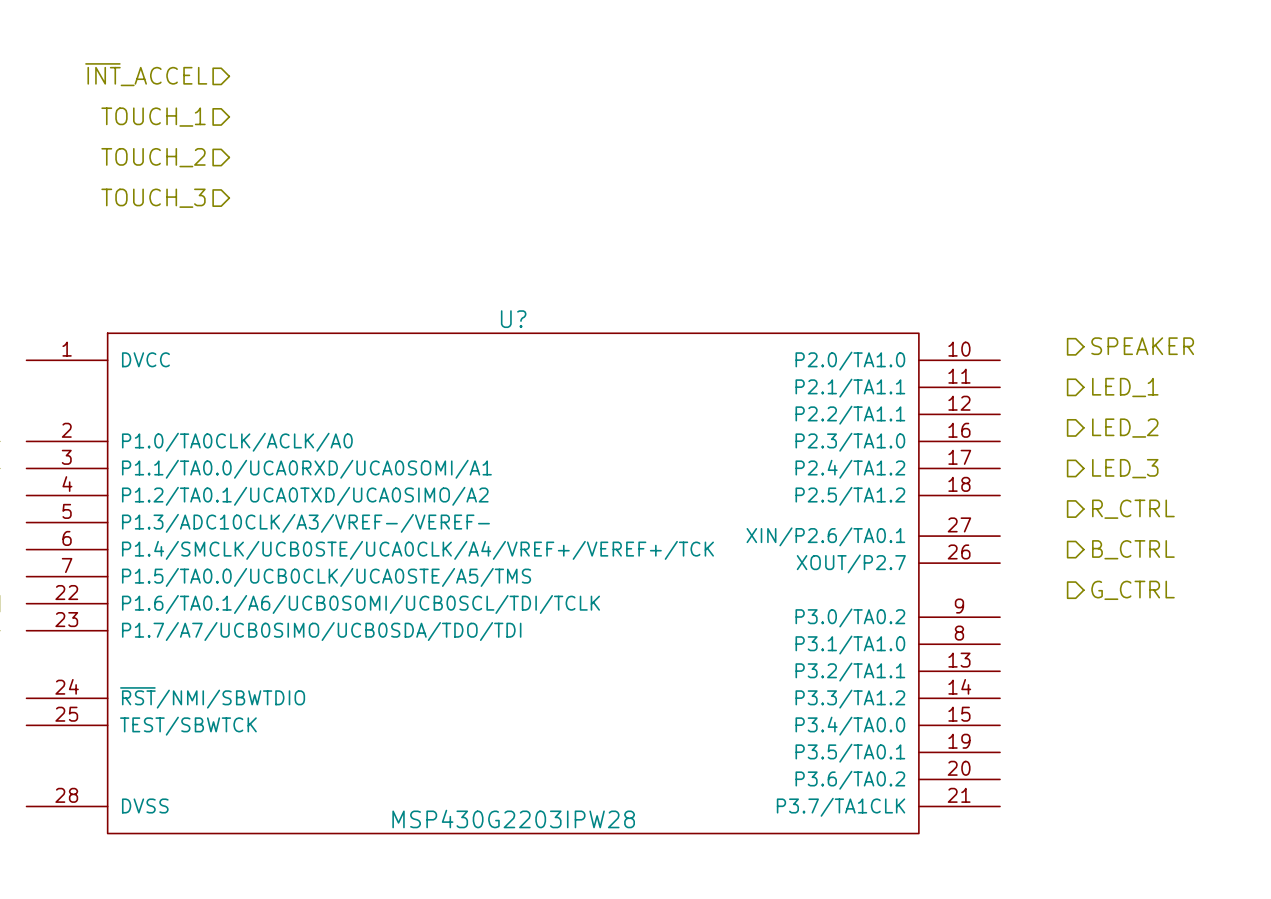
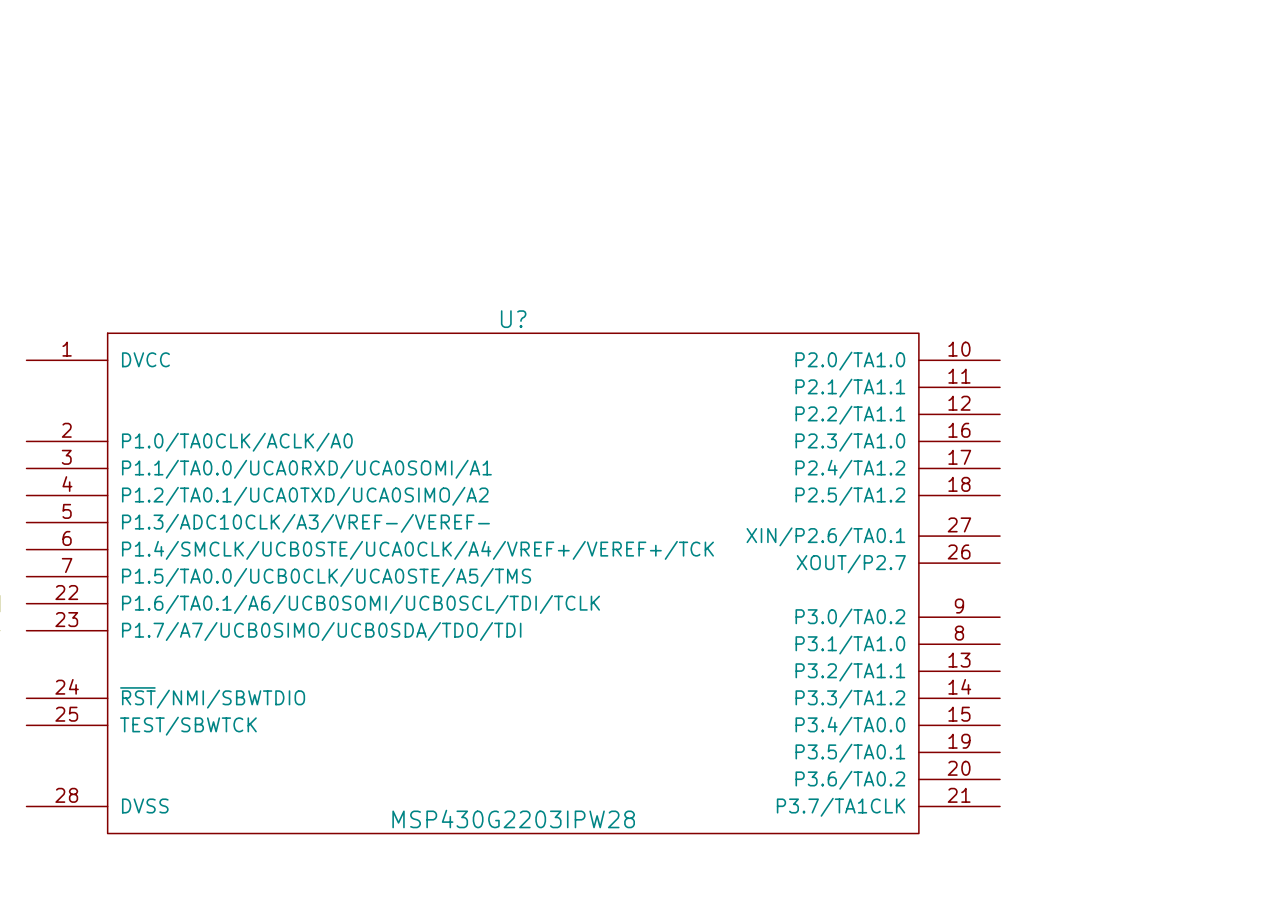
hierarchical label: ~{INT}_ACCEL (146, 74) -> none
hierarchical label: TOUCH_1 (153, 117) -> none
hierarchical label: TOUCH_2 (153, 157) -> none
hierarchical label: TOUCH_3 (153, 198) -> none
hierarchical label: SPEAKER (1142, 346) -> none
hierarchical label: LED_1 (1125, 387) -> none
hierarchical label: LED_2 (1125, 428) -> none
hierarchical label: LED_3 (1125, 468) -> none
hierarchical label: R_CTRL (1133, 509) -> none
hierarchical label: B_CTRL (1133, 549) -> none
hierarchical label: G_CTRL (1133, 590) -> none

